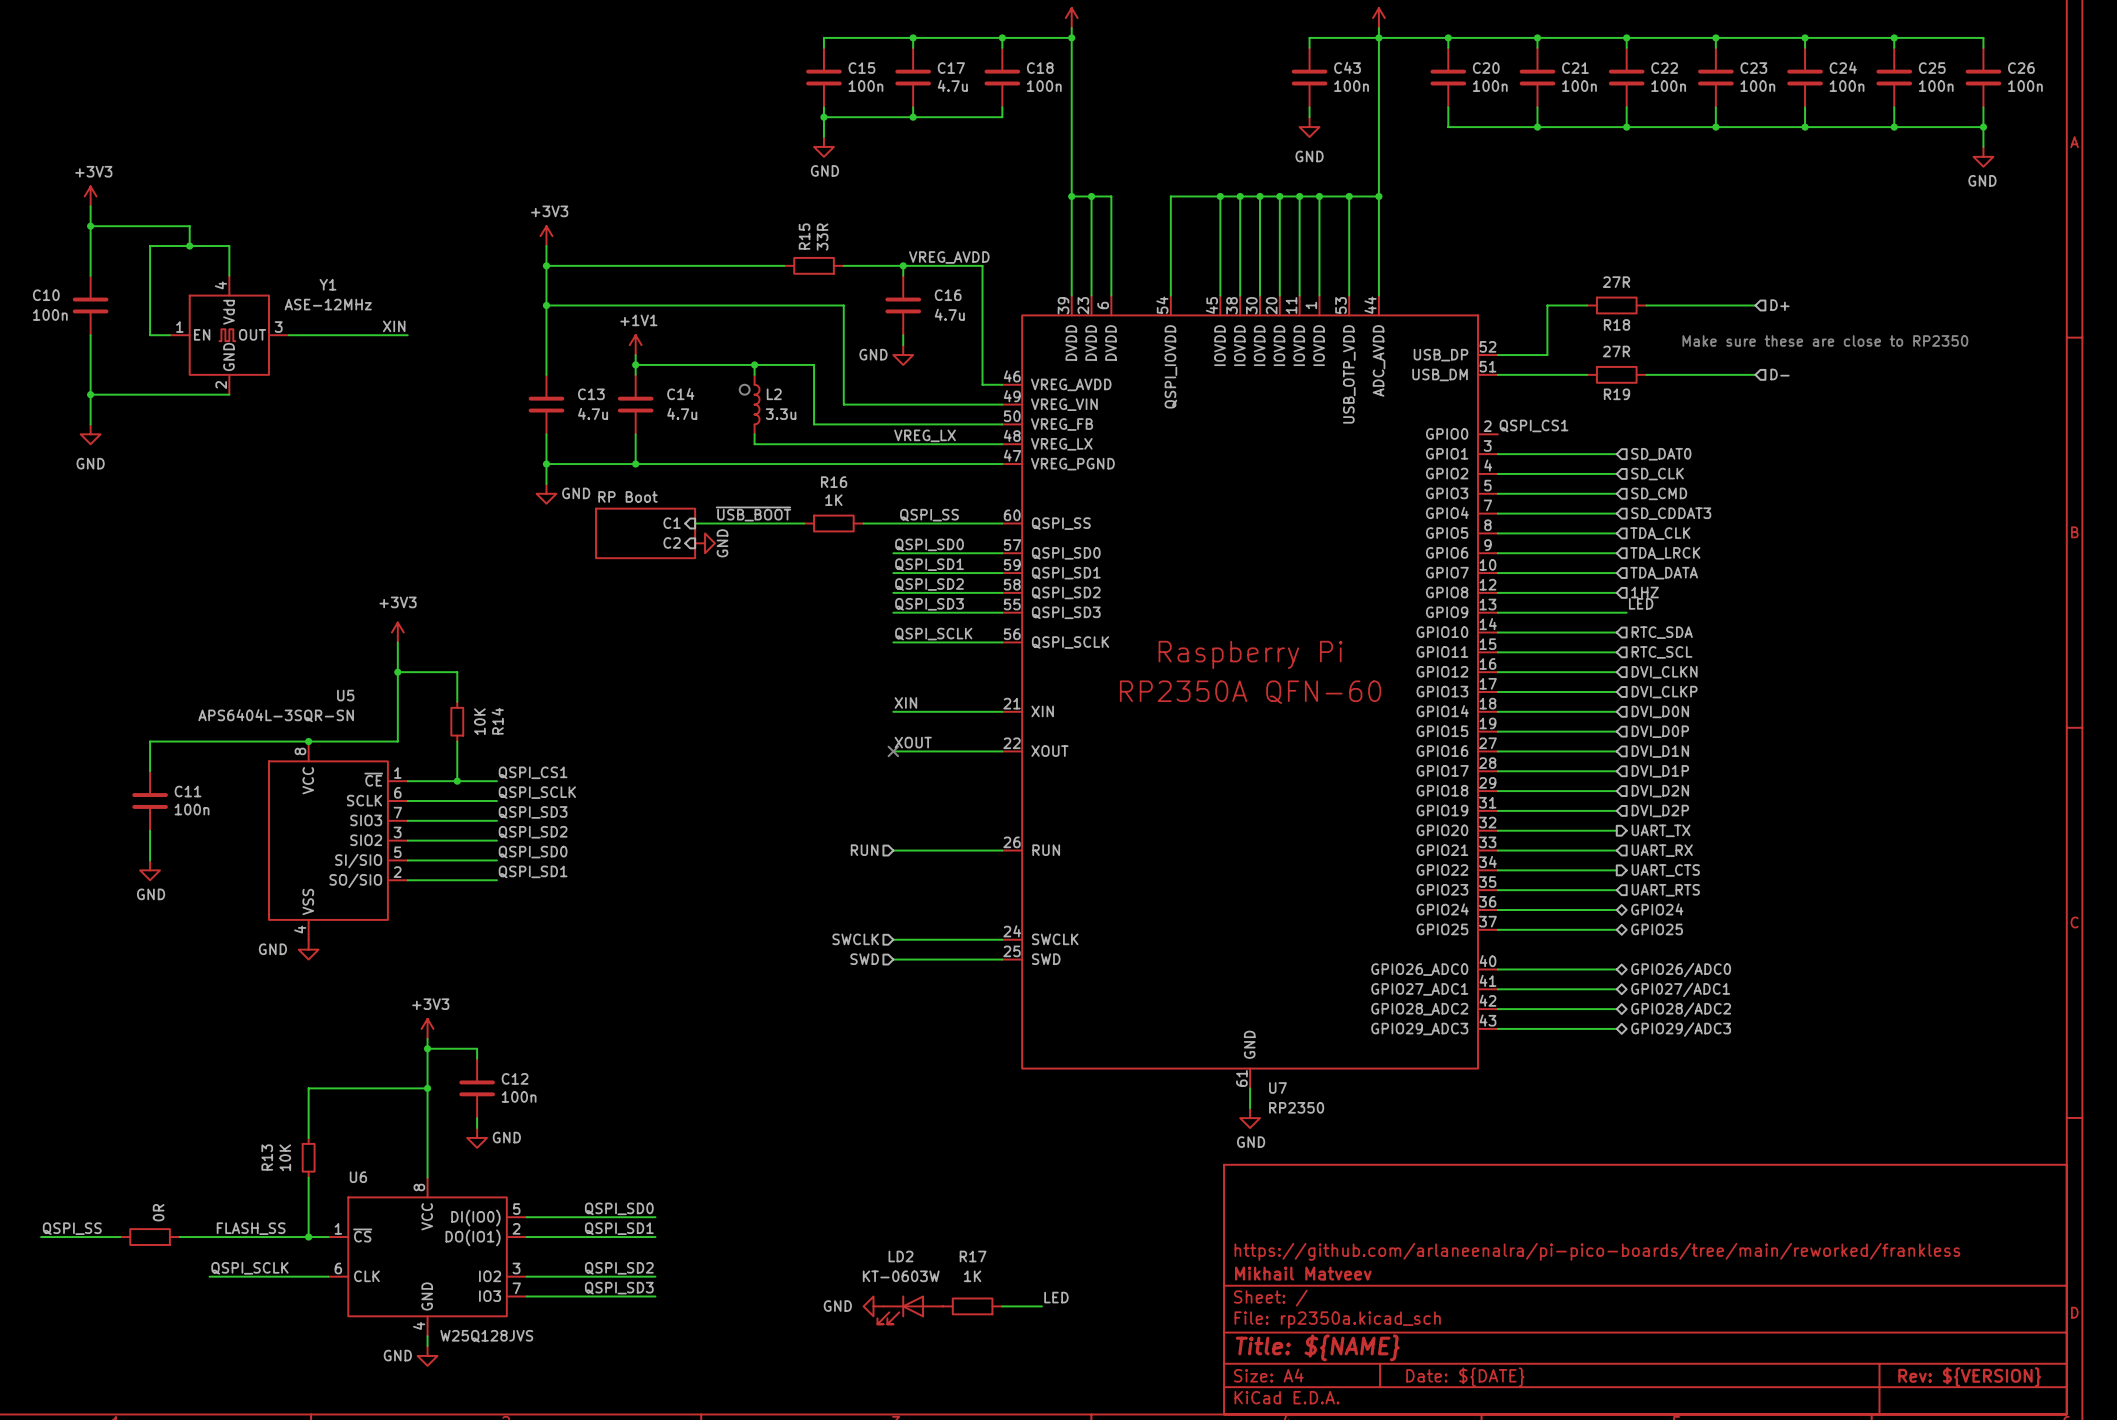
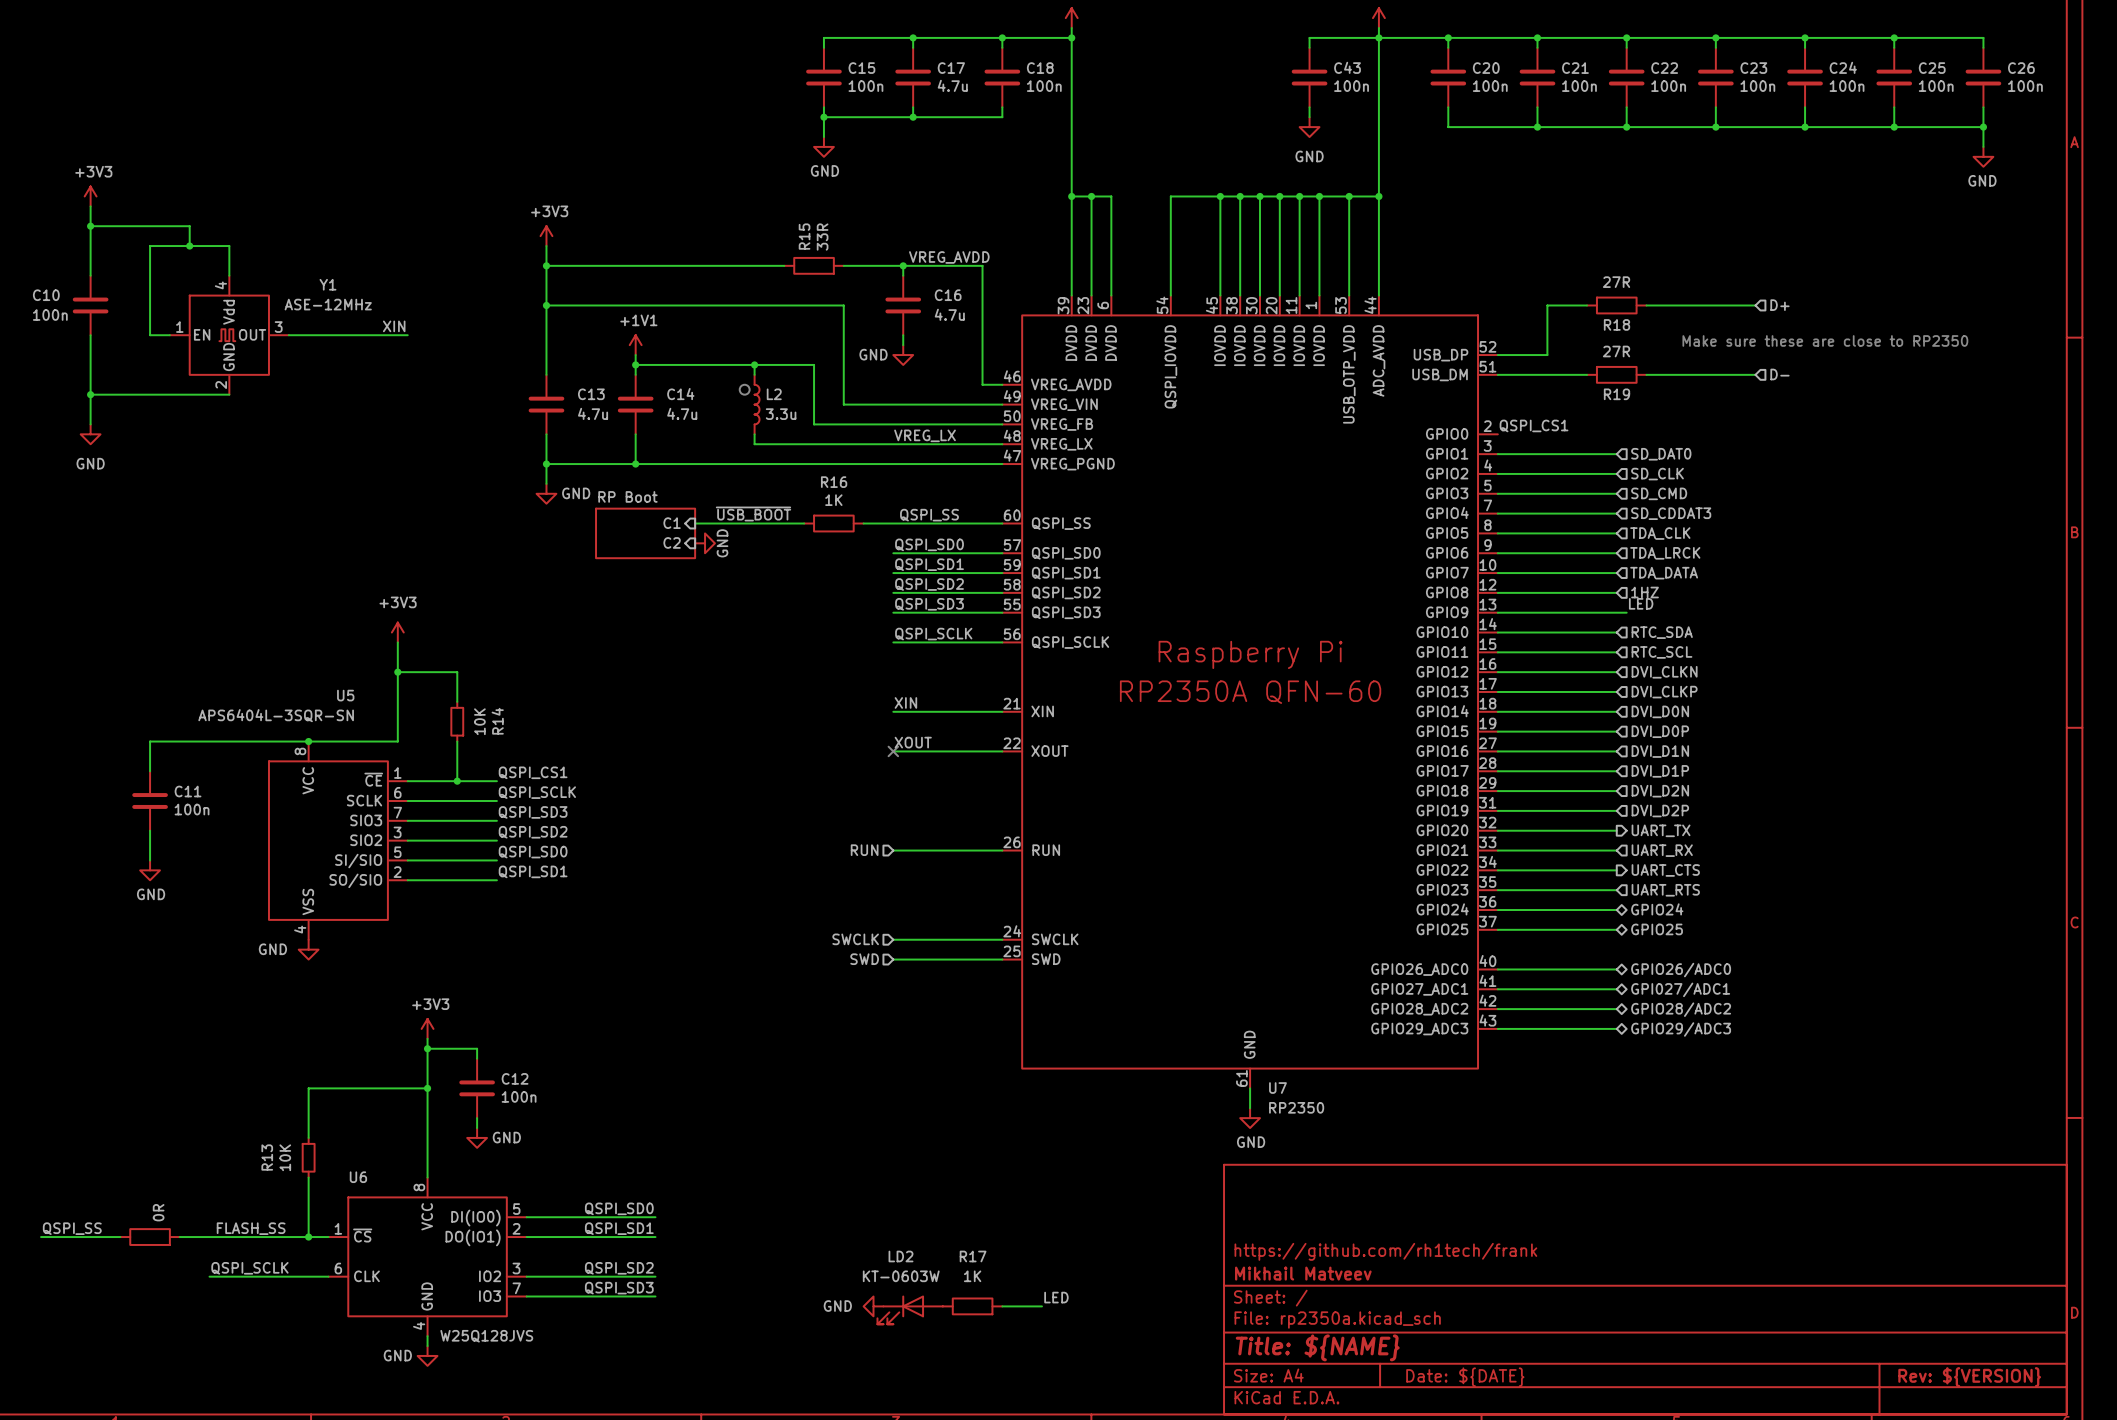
title block: https://github.com/arlaneenalra/pi-pico-boards/tree/main/reworked/frankless (1597, 1251) -> https://github.com/rh1tech/frank (1385, 1251)

